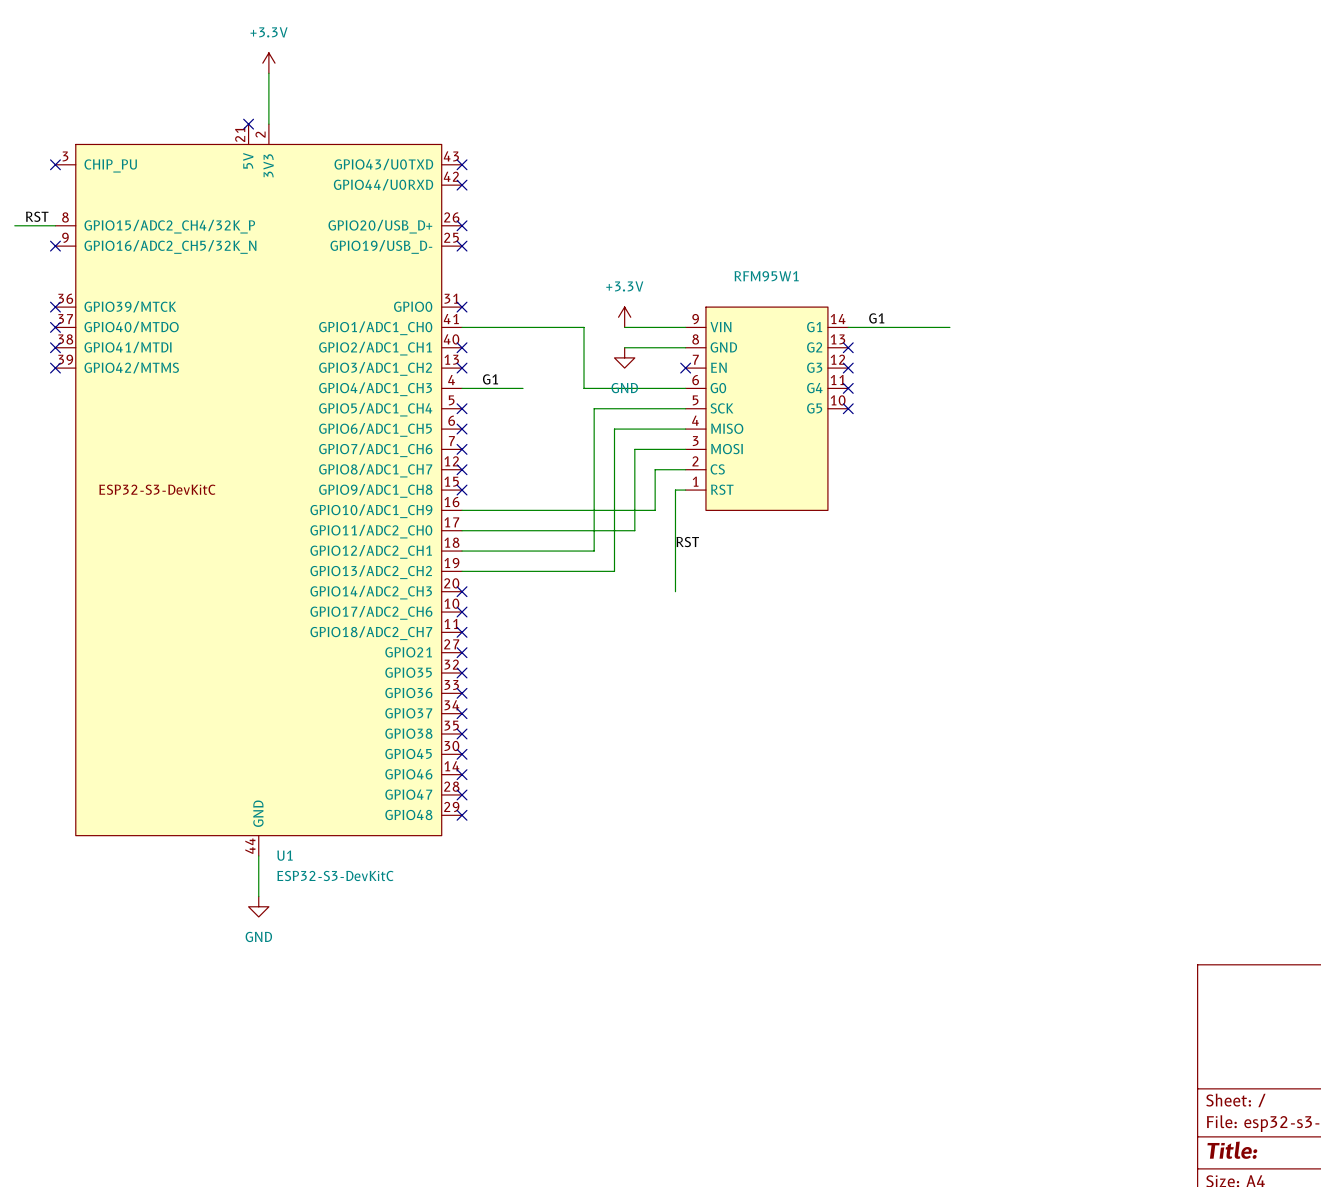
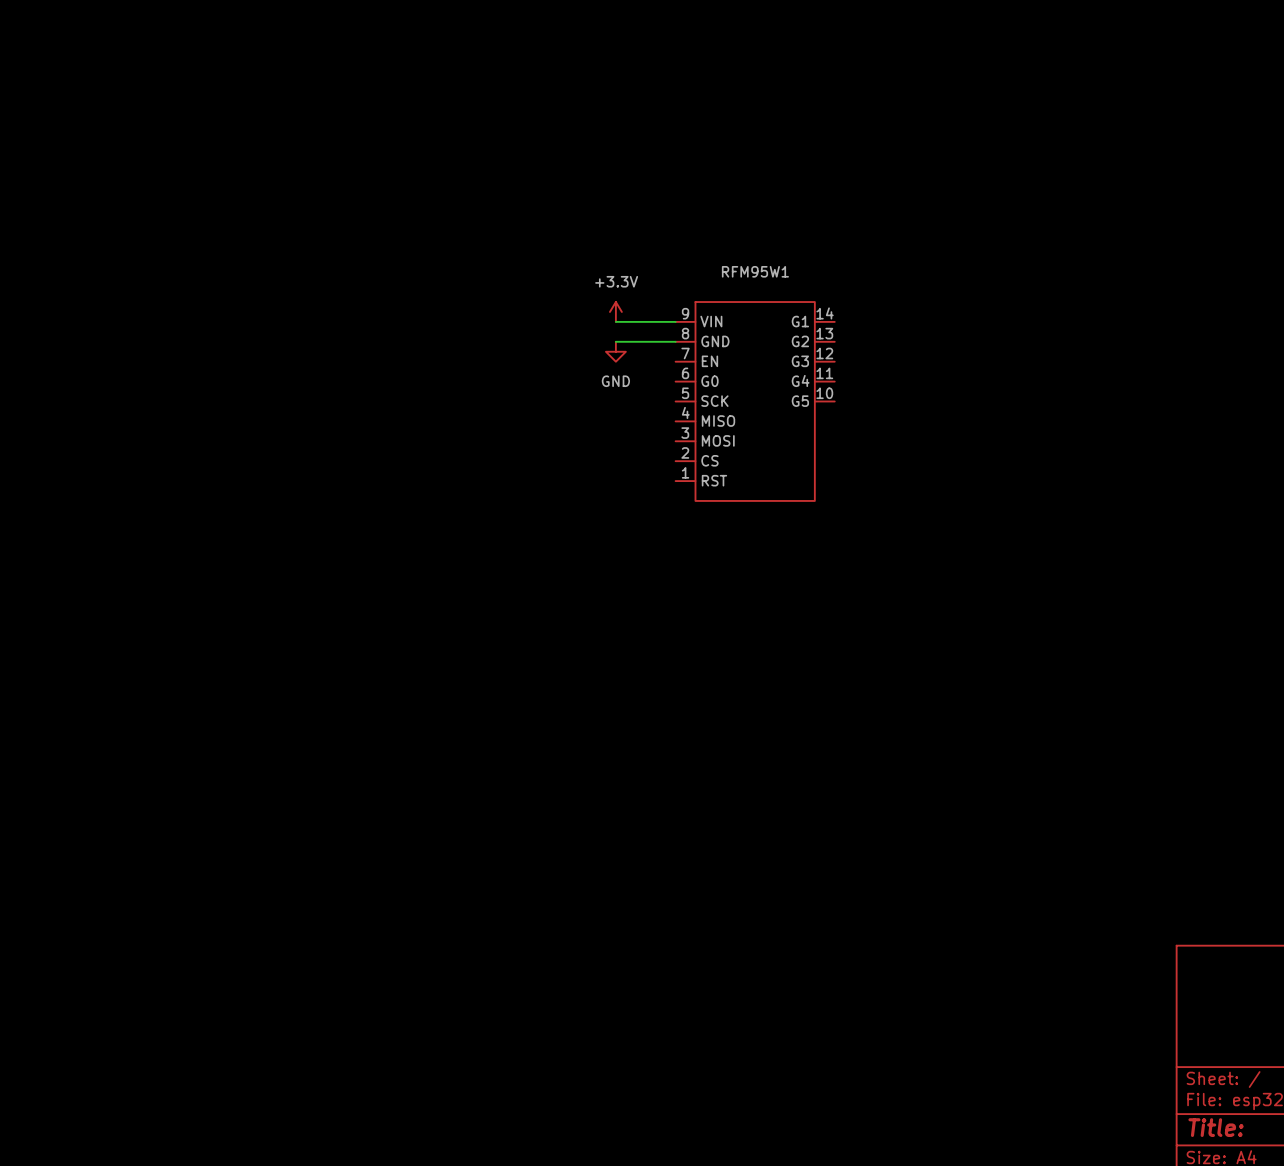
power symbol: +3.3V (268, 63) -> none
wire: (268, 73) (268, 124) -> none
no-connect mark: (248, 124) -> none
no-connect mark: (55, 164) -> none
no-connect mark: (462, 164) -> none
no-connect mark: (462, 185) -> none
label: RST (37, 216) -> none
wire: (14, 225) (55, 225) -> none
no-connect mark: (462, 225) -> none
no-connect mark: (55, 246) -> none
no-connect mark: (462, 246) -> none
no-connect mark: (55, 307) -> none
no-connect mark: (462, 307) -> none
label: G1 (876, 318) -> none
no-connect mark: (55, 327) -> none
wire: (462, 327) (584, 327) (584, 388) (685, 388) -> none
wire: (848, 327) (949, 327) -> none
no-connect mark: (55, 347) -> none
no-connect mark: (462, 347) -> none
no-connect mark: (848, 347) -> none
no-connect mark: (55, 368) -> none
no-connect mark: (462, 368) -> none
no-connect mark: (685, 368) -> none
no-connect mark: (848, 368) -> none
label: G1 (490, 379) -> none
wire: (462, 388) (523, 388) -> none
no-connect mark: (848, 388) -> none
no-connect mark: (462, 408) -> none
wire: (685, 408) (594, 408) (594, 551) (462, 551) -> none
no-connect mark: (848, 408) -> none
no-connect mark: (462, 429) -> none
wire: (685, 429) (614, 429) (614, 571) (462, 571) -> none
no-connect mark: (462, 449) -> none
wire: (685, 449) (634, 449) (634, 530) (462, 530) -> none
no-connect mark: (462, 469) -> none
wire: (685, 469) (655, 469) (655, 510) (462, 510) -> none
U1: ESP32-S3-DevKitC (258, 490) -> none
no-connect mark: (462, 490) -> none
wire: (685, 490) (675, 490) (675, 591) -> none
label: RST (687, 542) -> none
no-connect mark: (462, 591) -> none
no-connect mark: (462, 612) -> none
no-connect mark: (462, 632) -> none
no-connect mark: (462, 652) -> none
no-connect mark: (462, 673) -> none
no-connect mark: (462, 693) -> none
no-connect mark: (462, 713) -> none
no-connect mark: (462, 733) -> none
no-connect mark: (462, 754) -> none
no-connect mark: (462, 774) -> none
no-connect mark: (462, 794) -> none
no-connect mark: (462, 815) -> none
wire: (258, 855) (258, 896) -> none
power symbol: GND (258, 906) -> none

